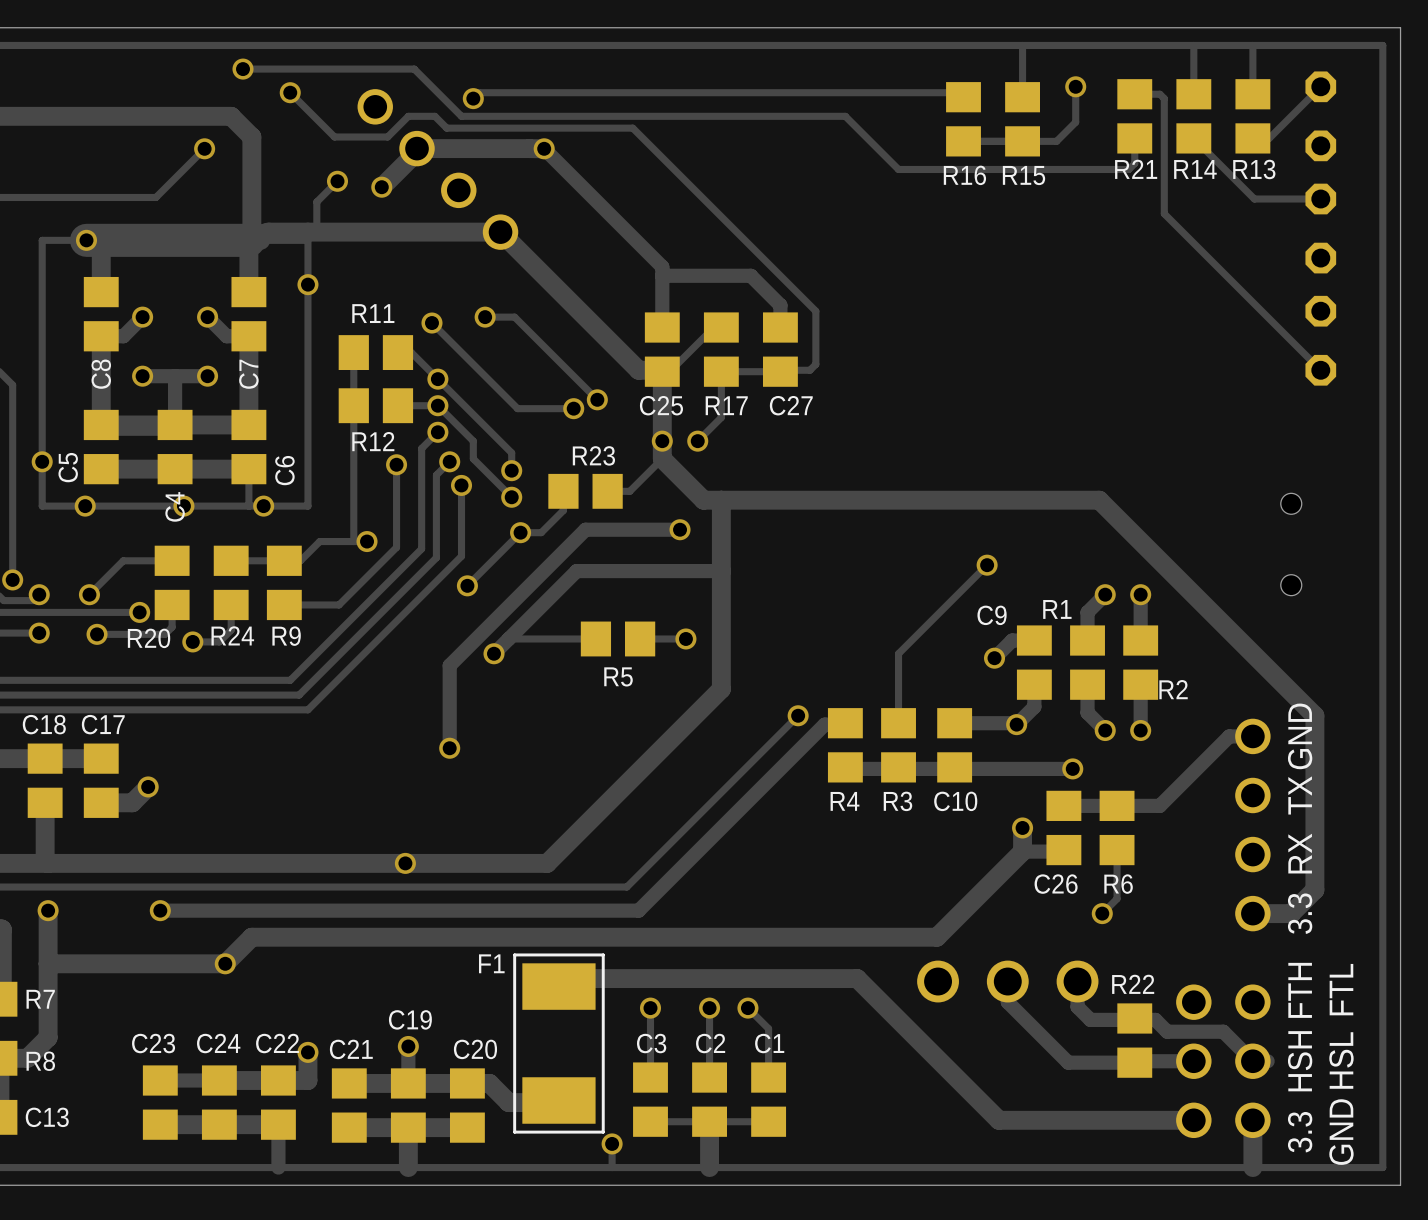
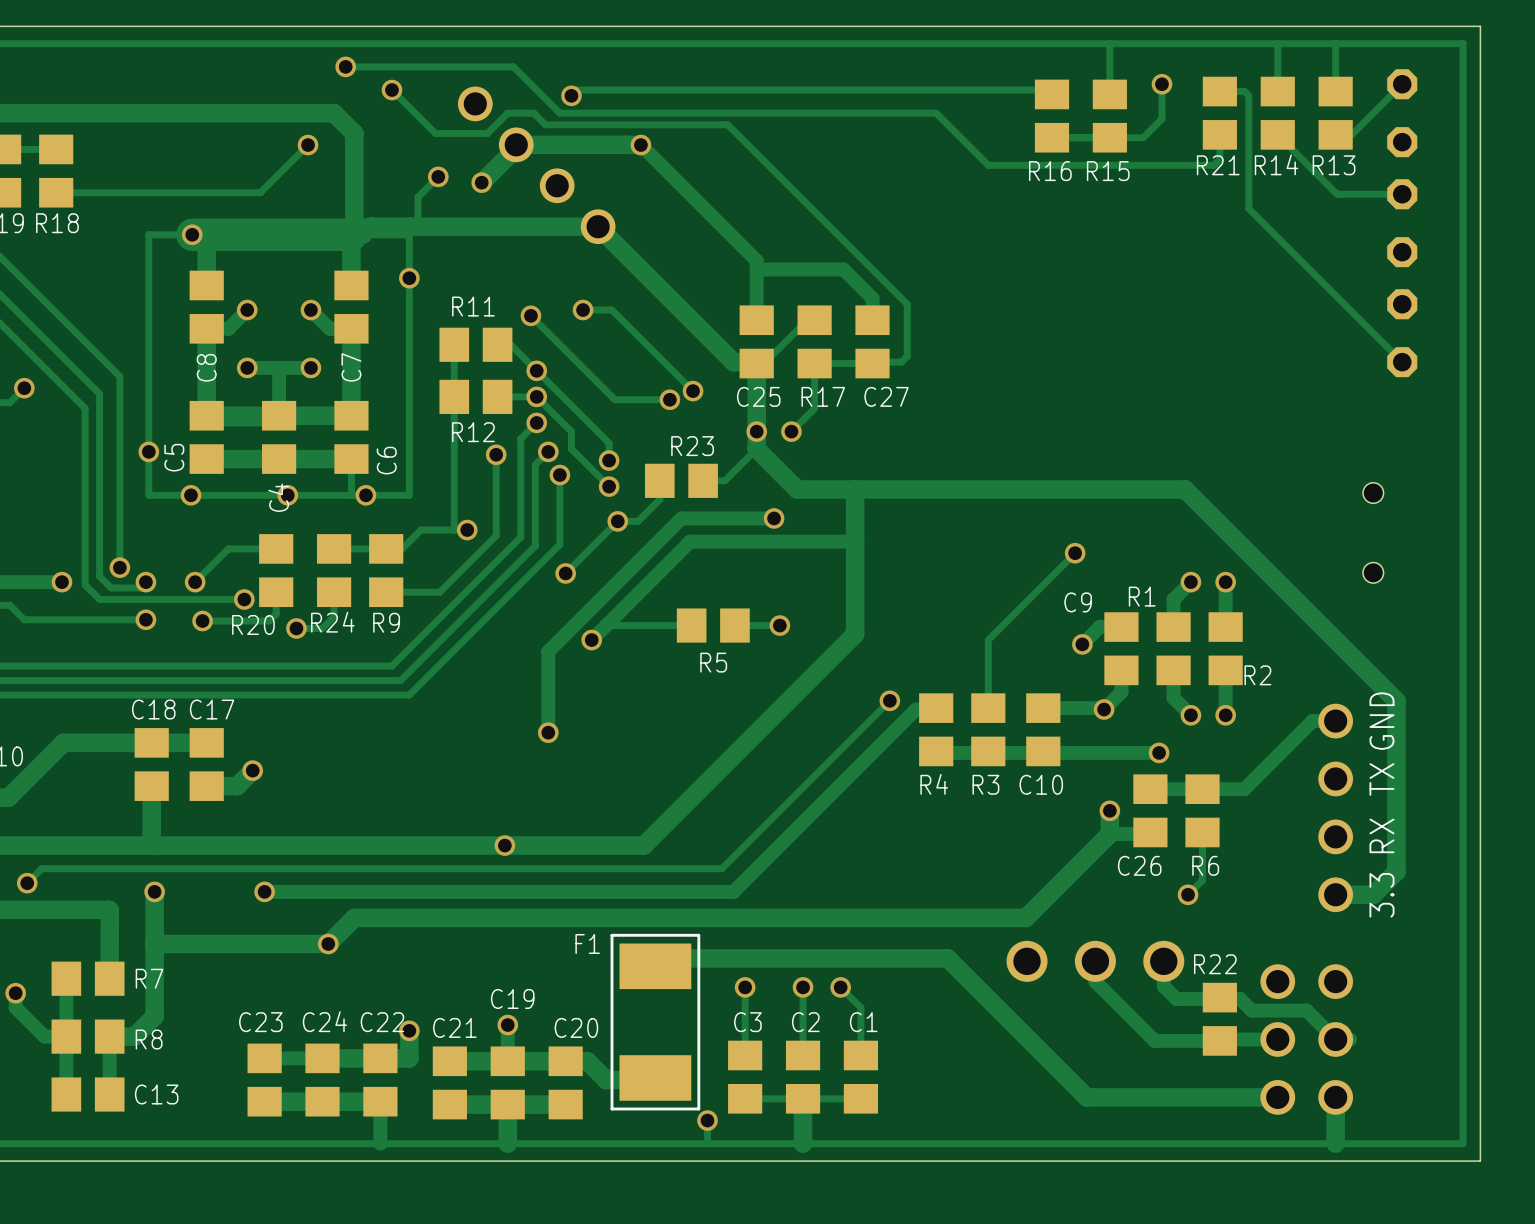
track: (721, 500) (721, 689) -> (855, 489) (855, 634) (814, 674)
track: (721, 571) (576, 571) -> (855, 541) (690, 541) (672, 558)
text: FTL (1341, 989) -> none
text: FTH (1300, 990) -> none
text: HSL (1341, 1060) -> none
text: HSH (1300, 1061) -> none
text: 3.3 (1300, 1132) -> none
text: GND (1341, 1132) -> none

